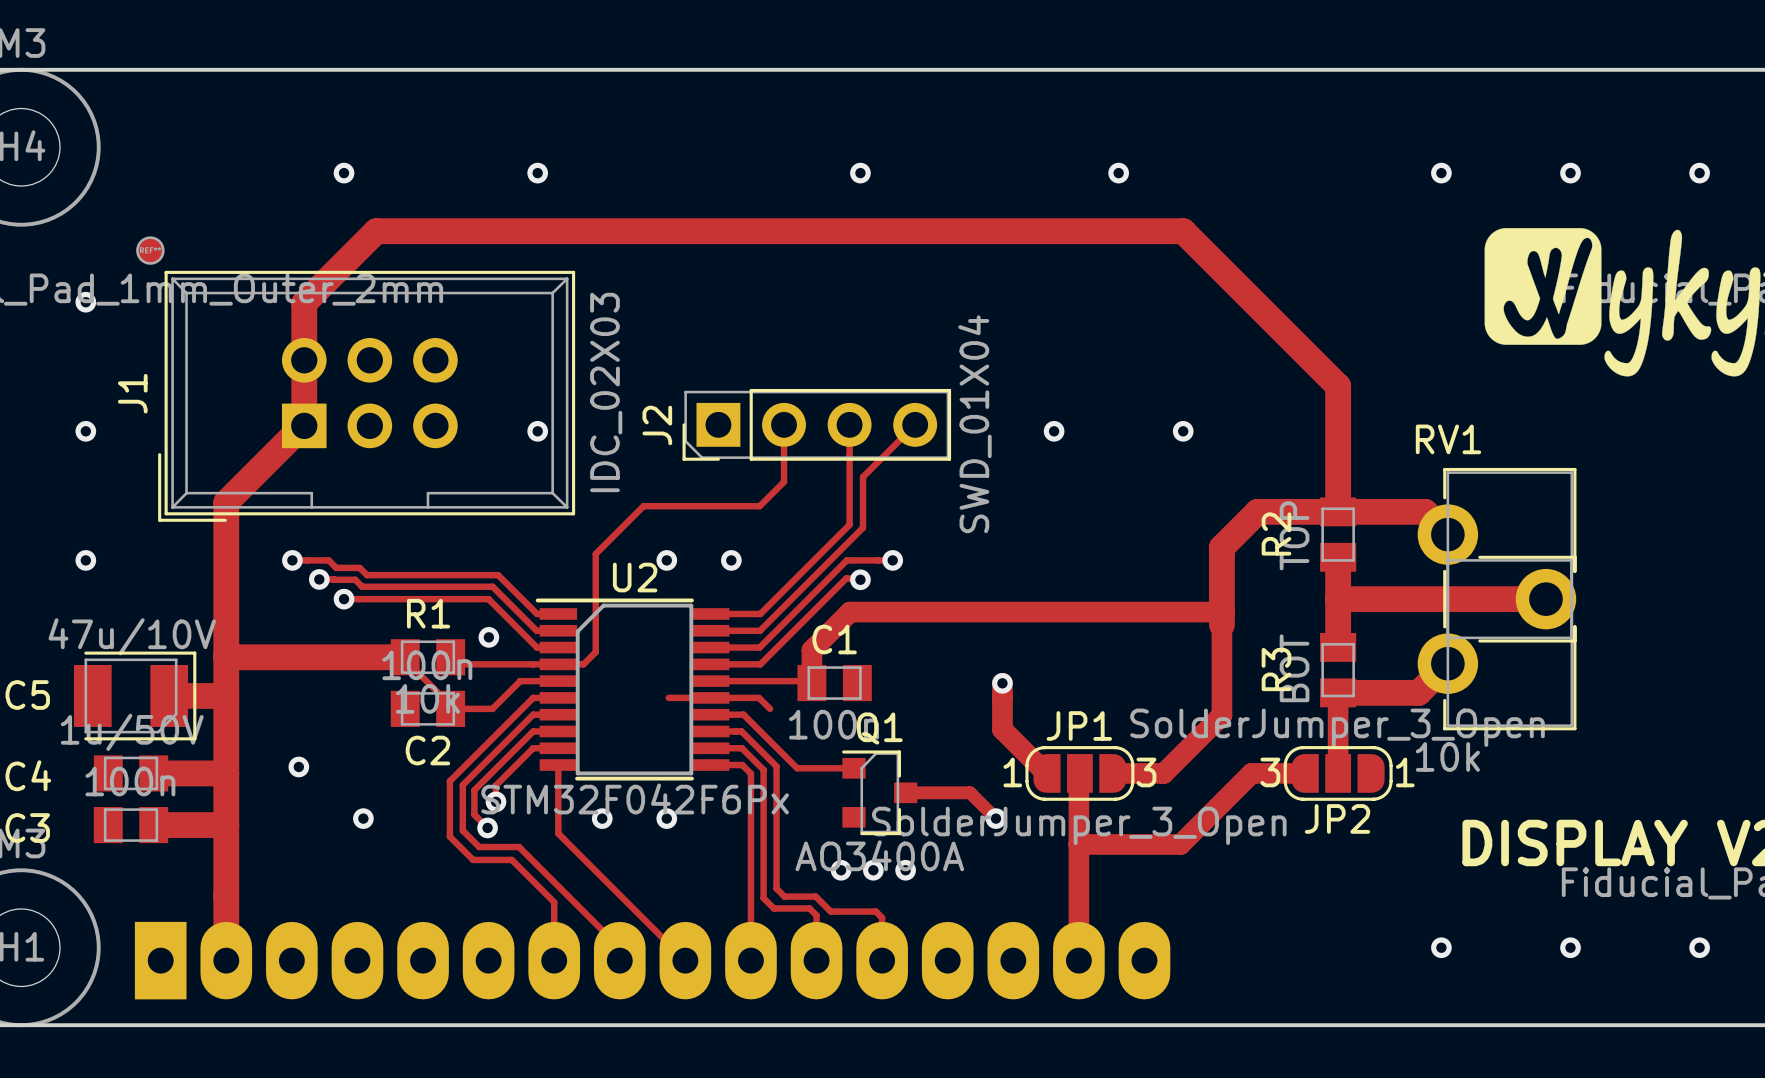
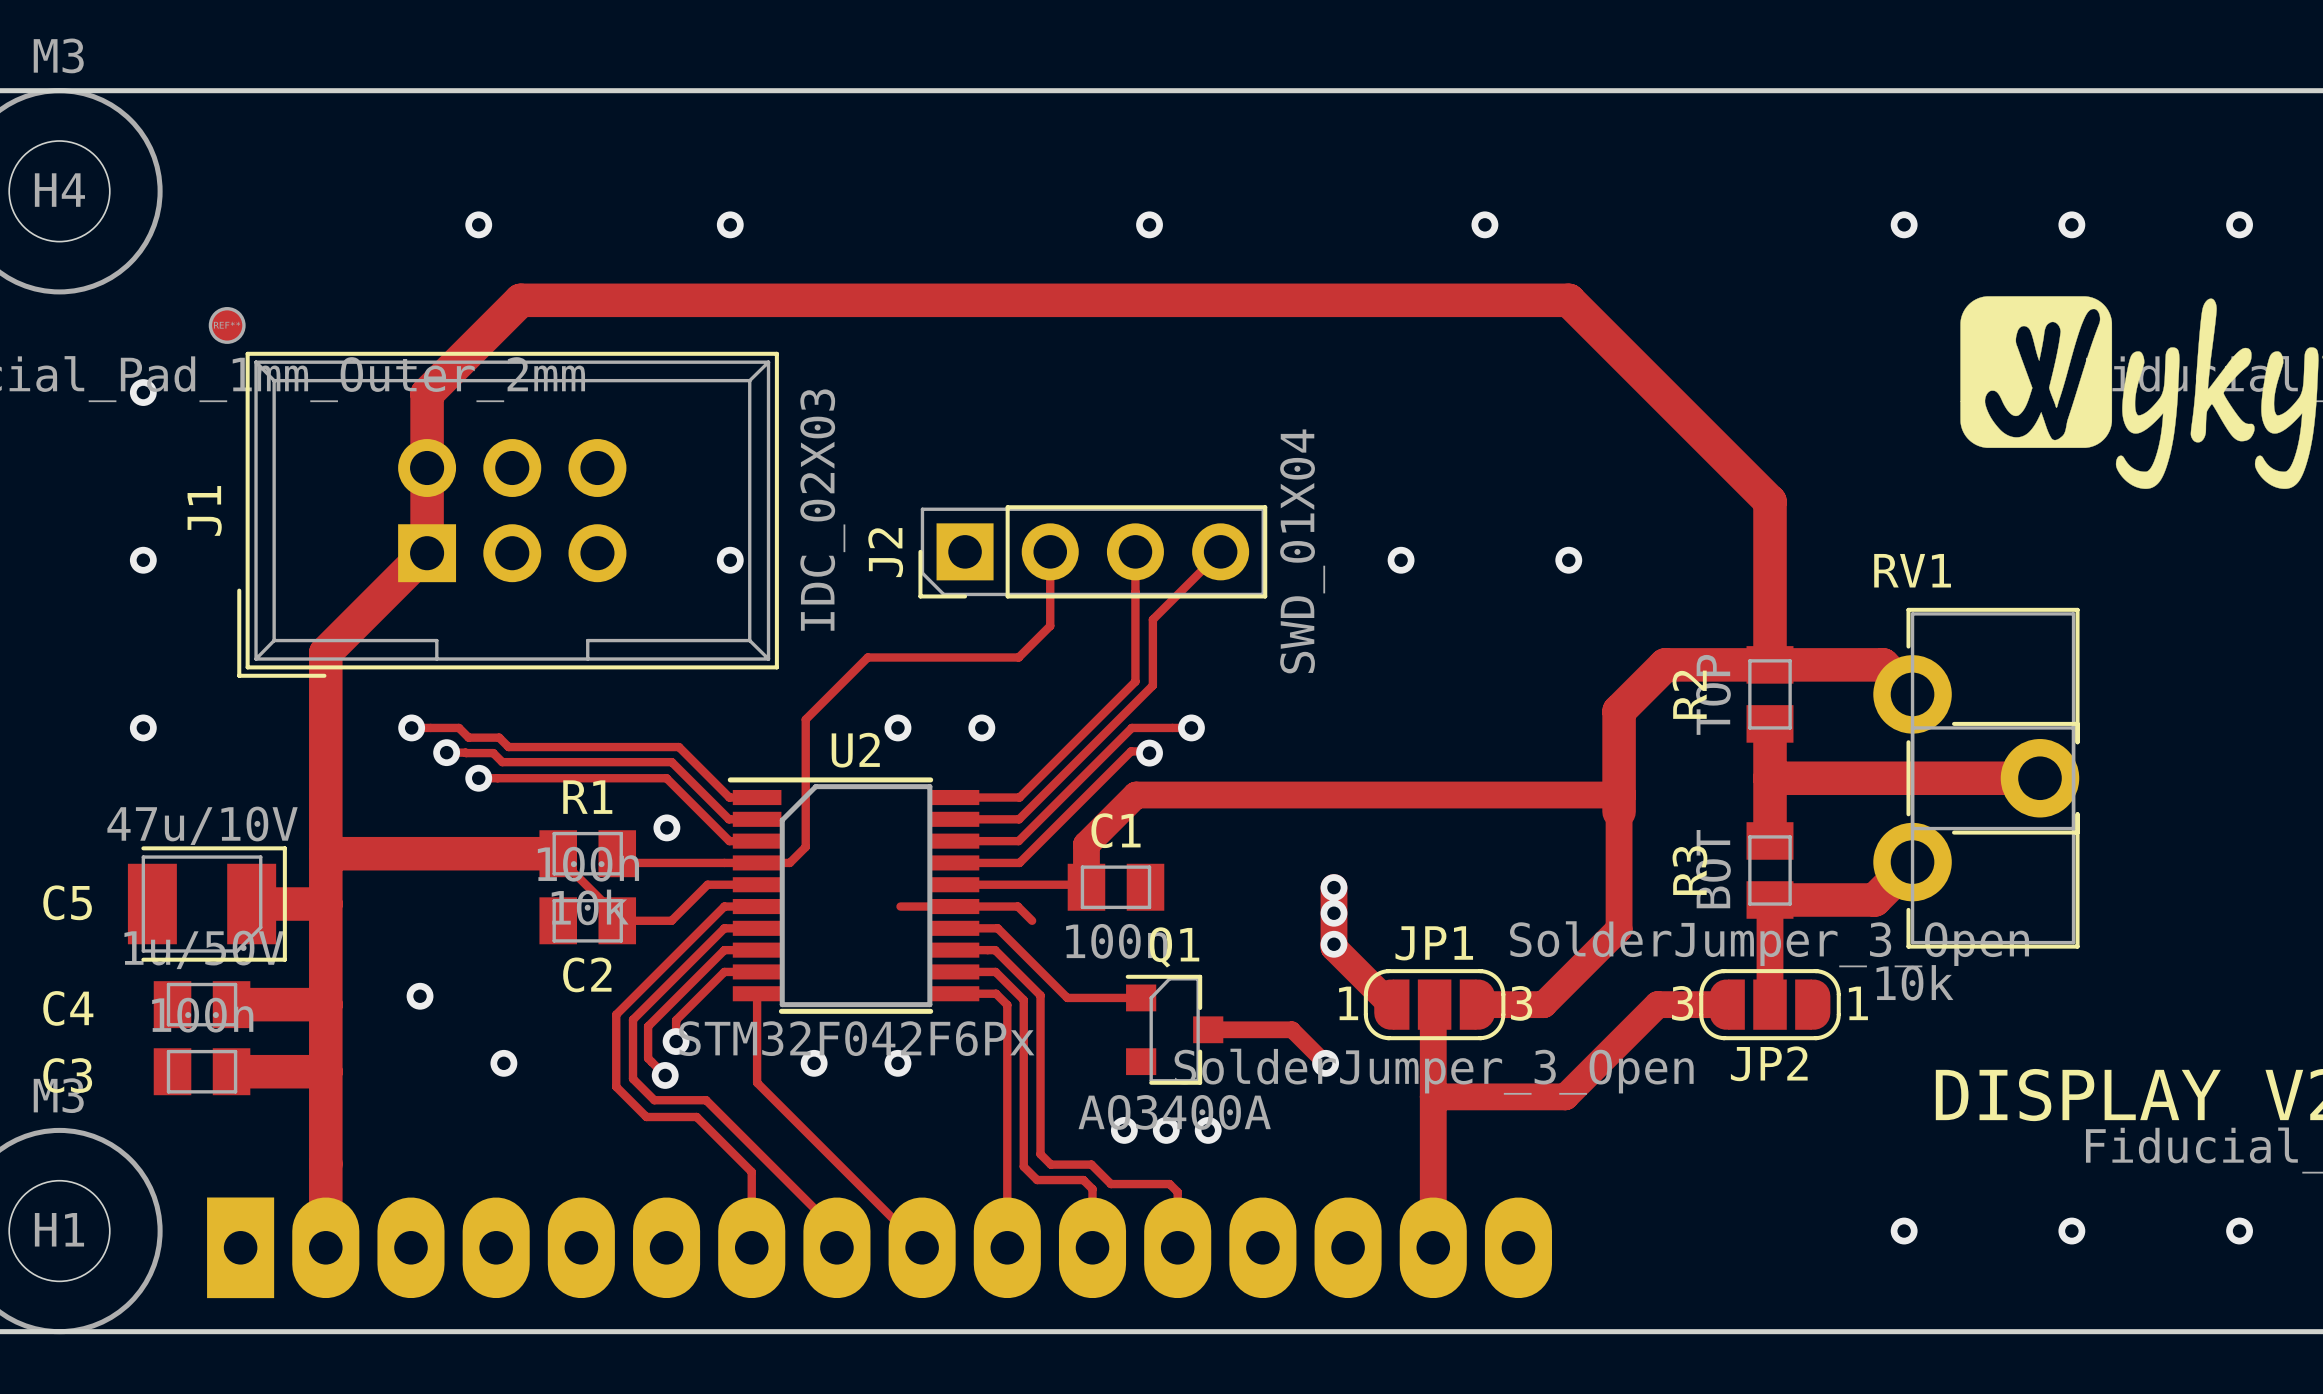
via: none -> (1333, 913)
via: none -> (1333, 944)

